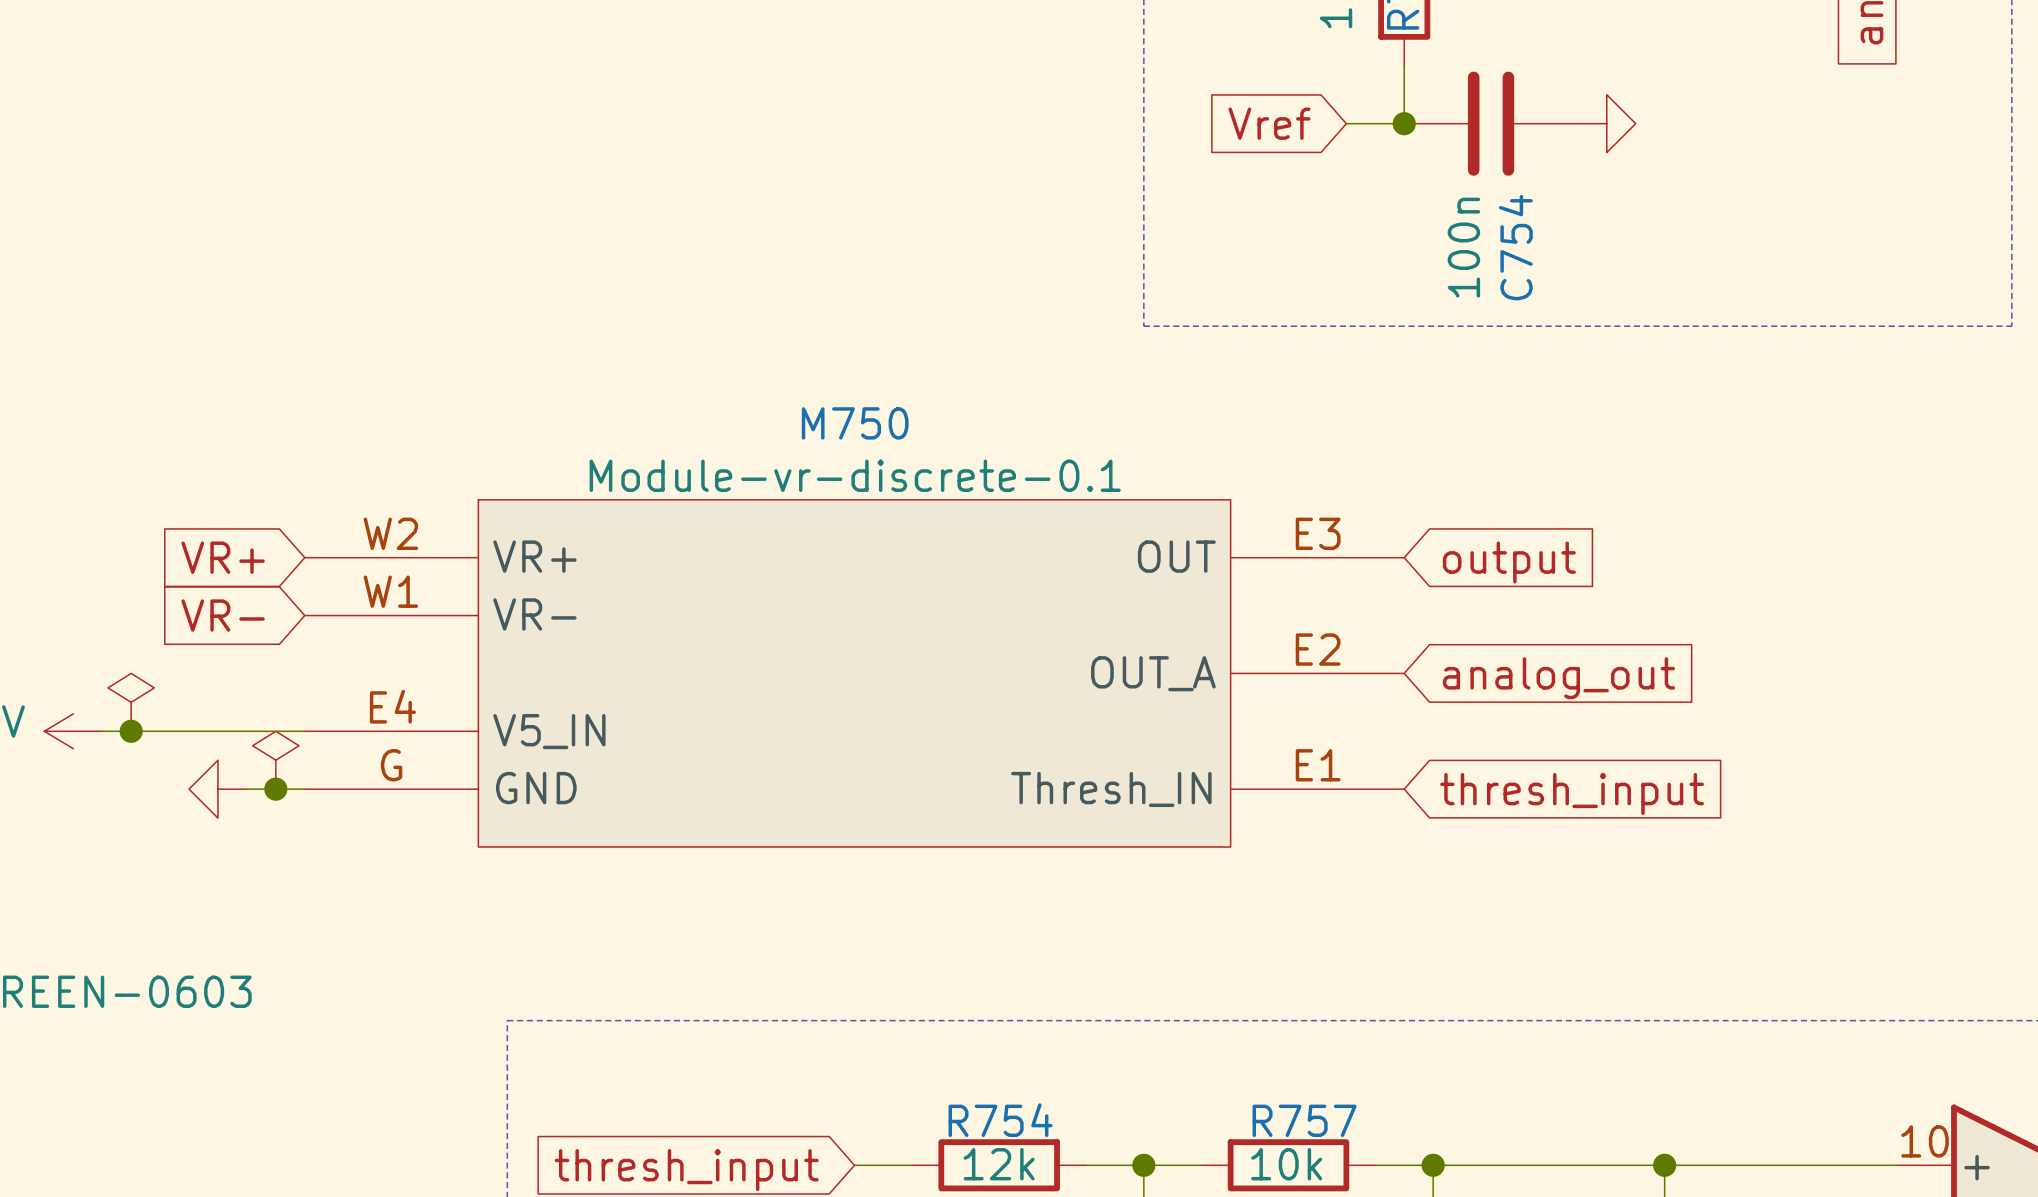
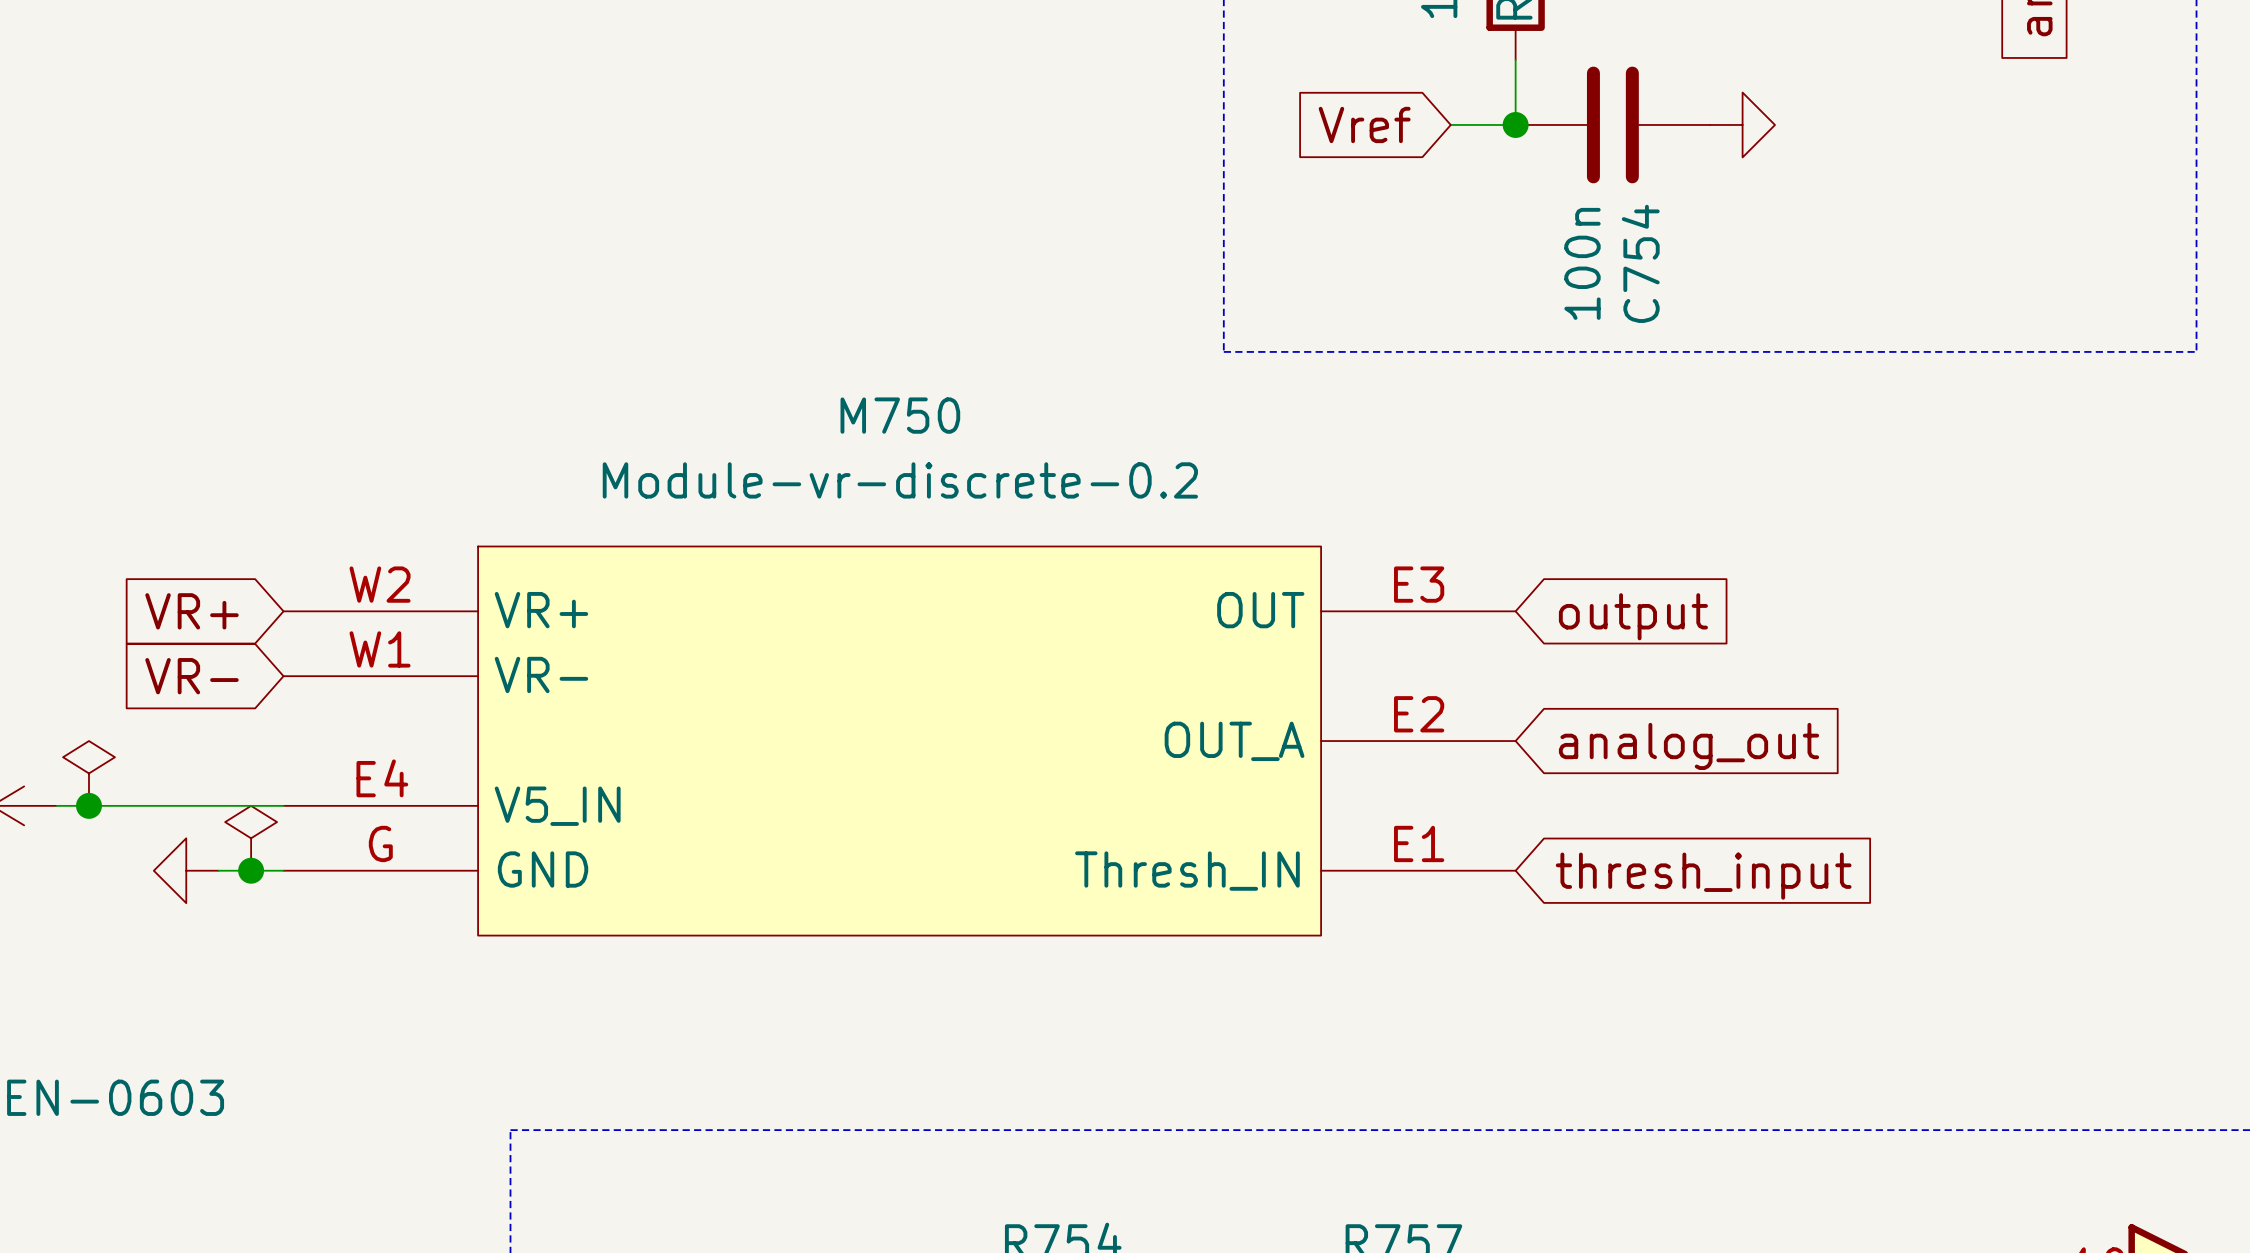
M750 name position: M750 (855, 423) -> M750 (900, 415)
M750 value: Module-vr-discrete-0.1 (855, 475) -> Module-vr-discrete-0.2 (900, 480)

